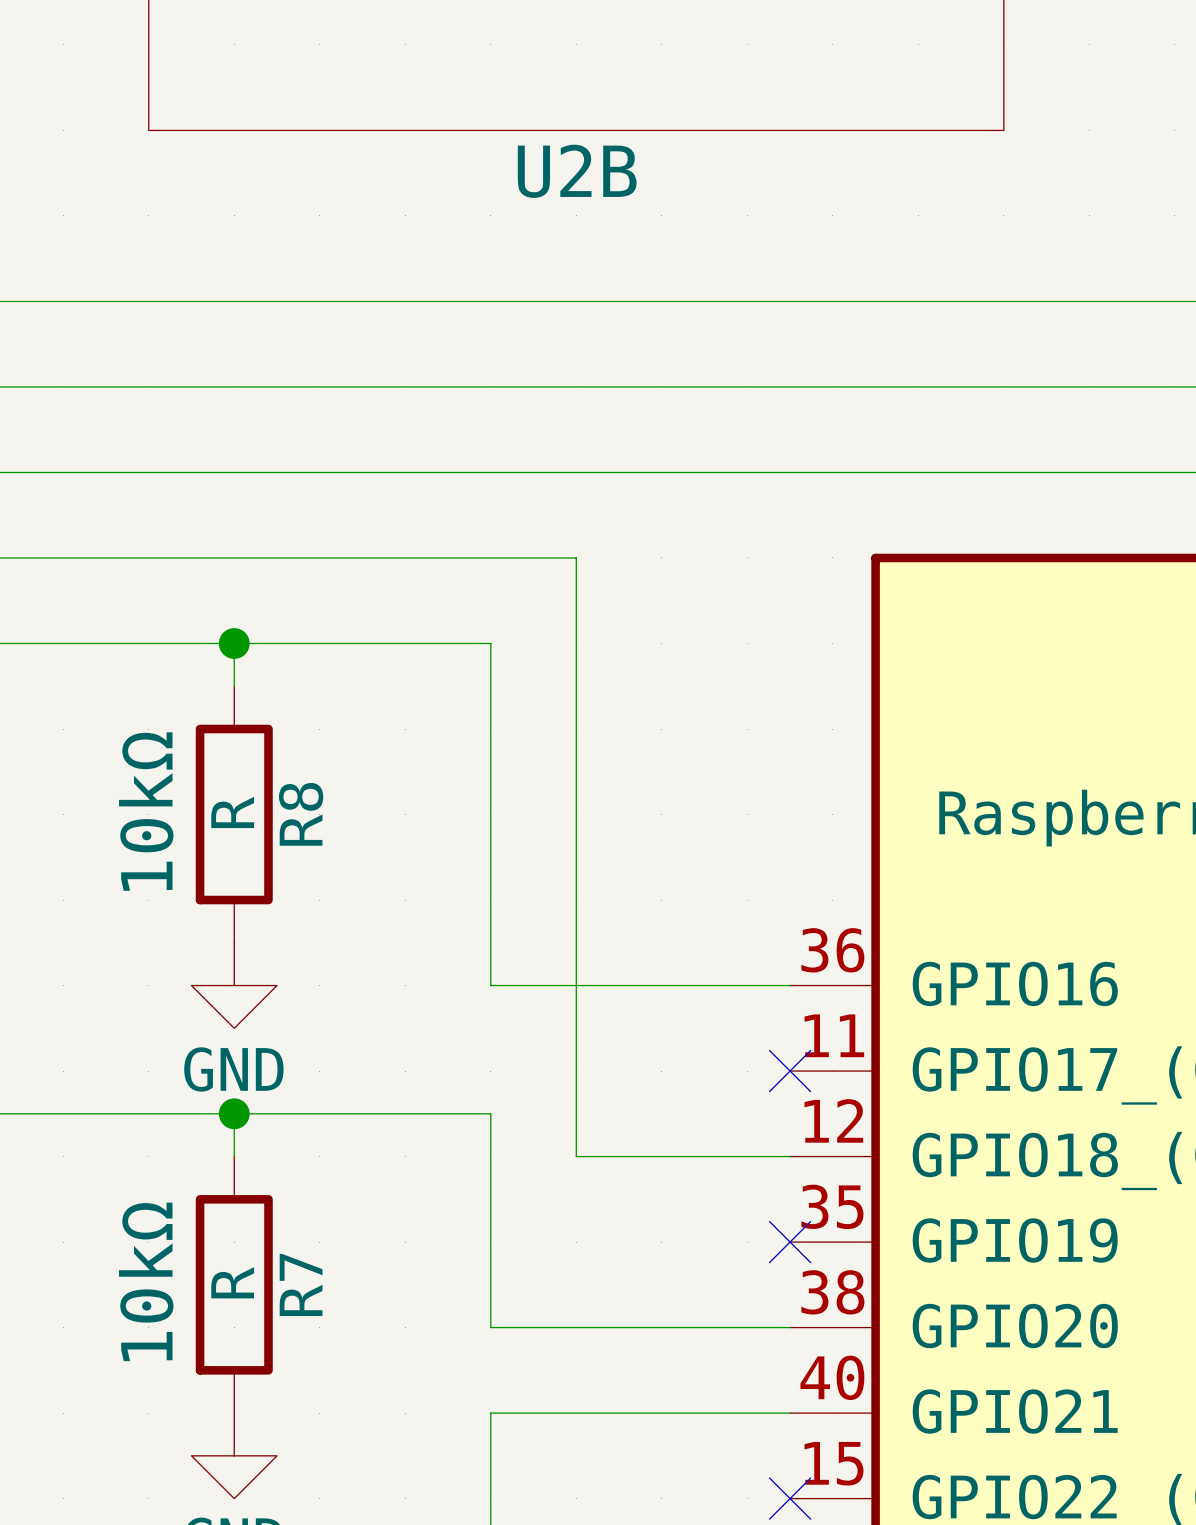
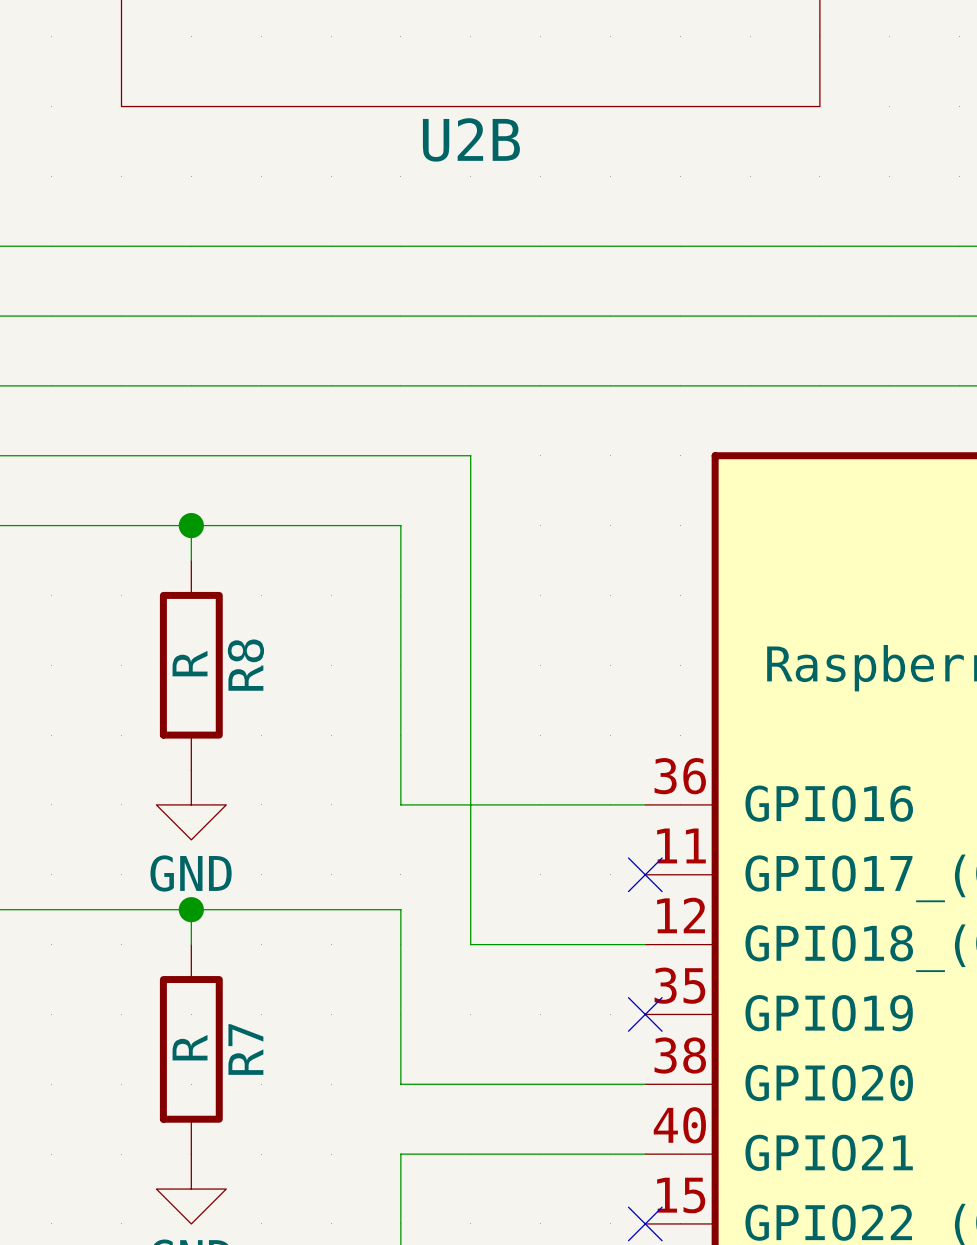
R8 text: 10kΩ (146, 811) -> none
R7 text: 10kΩ (146, 1281) -> none

